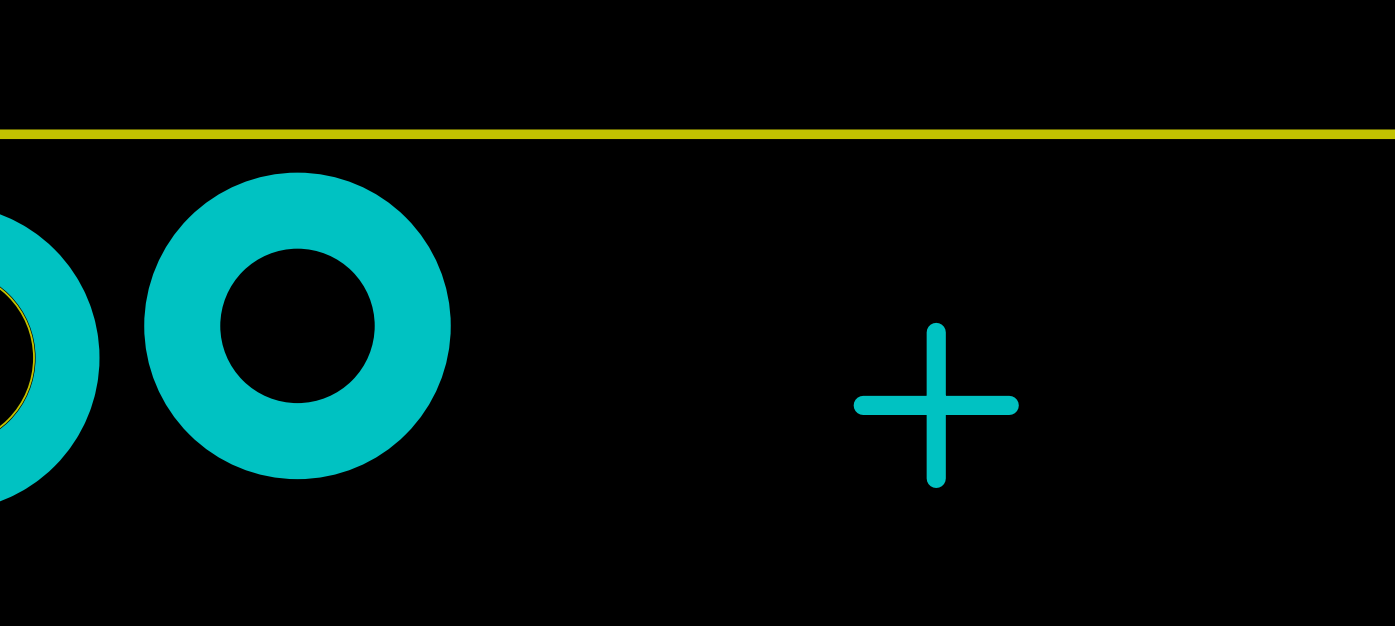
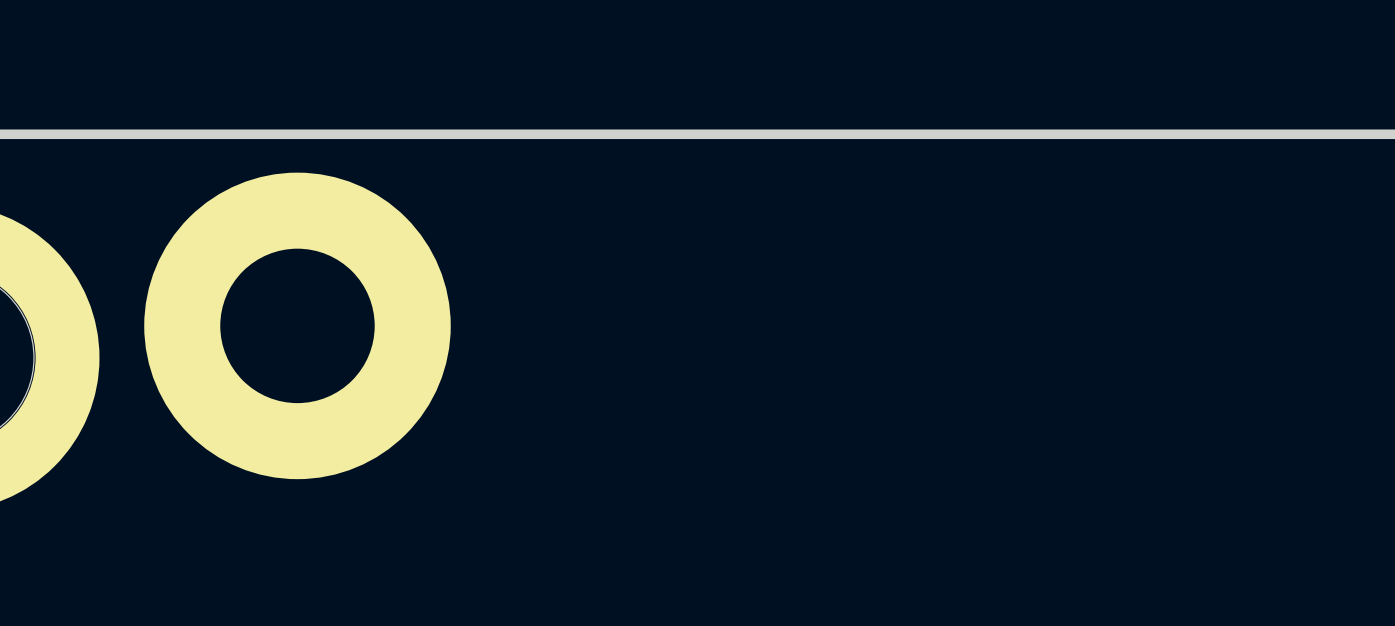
text: + (936, 405) -> none

